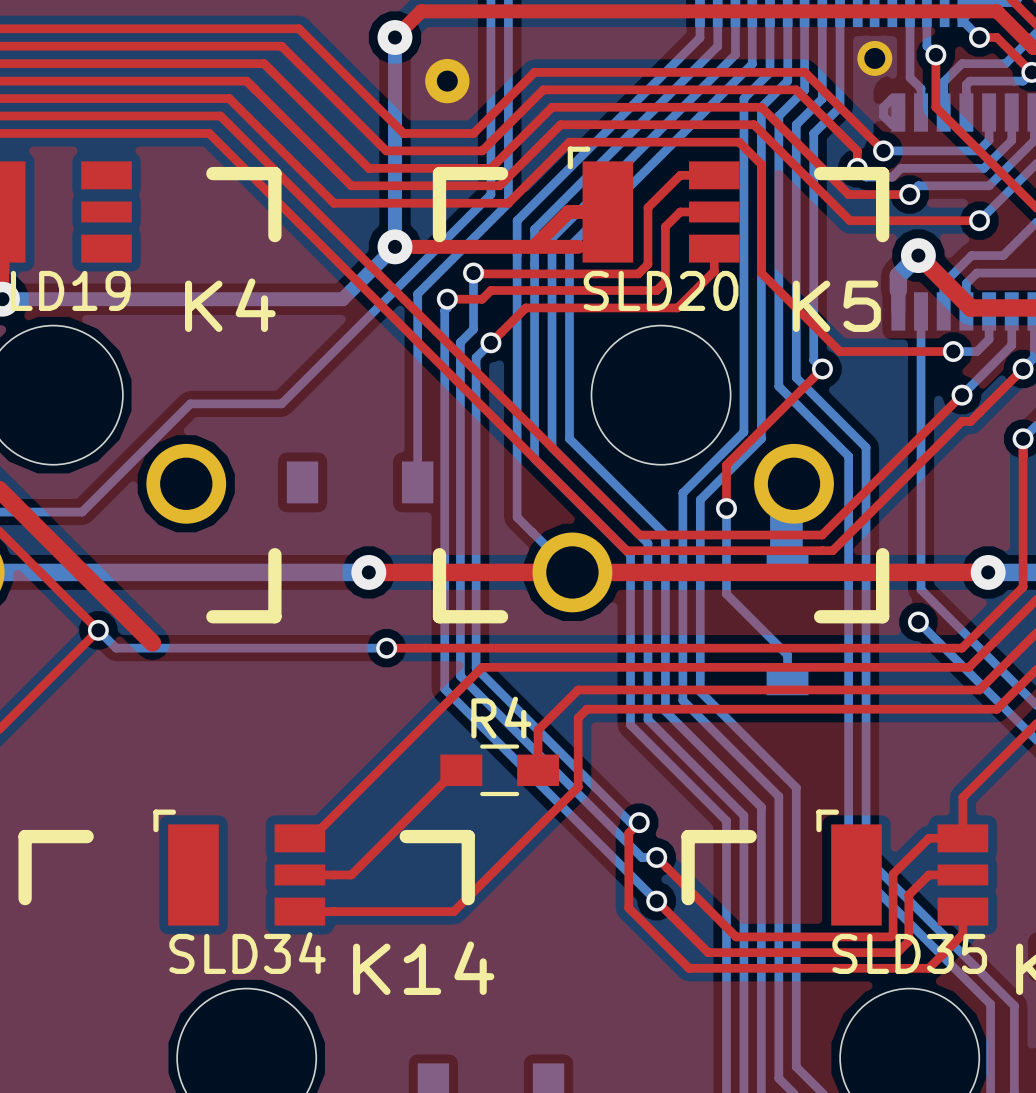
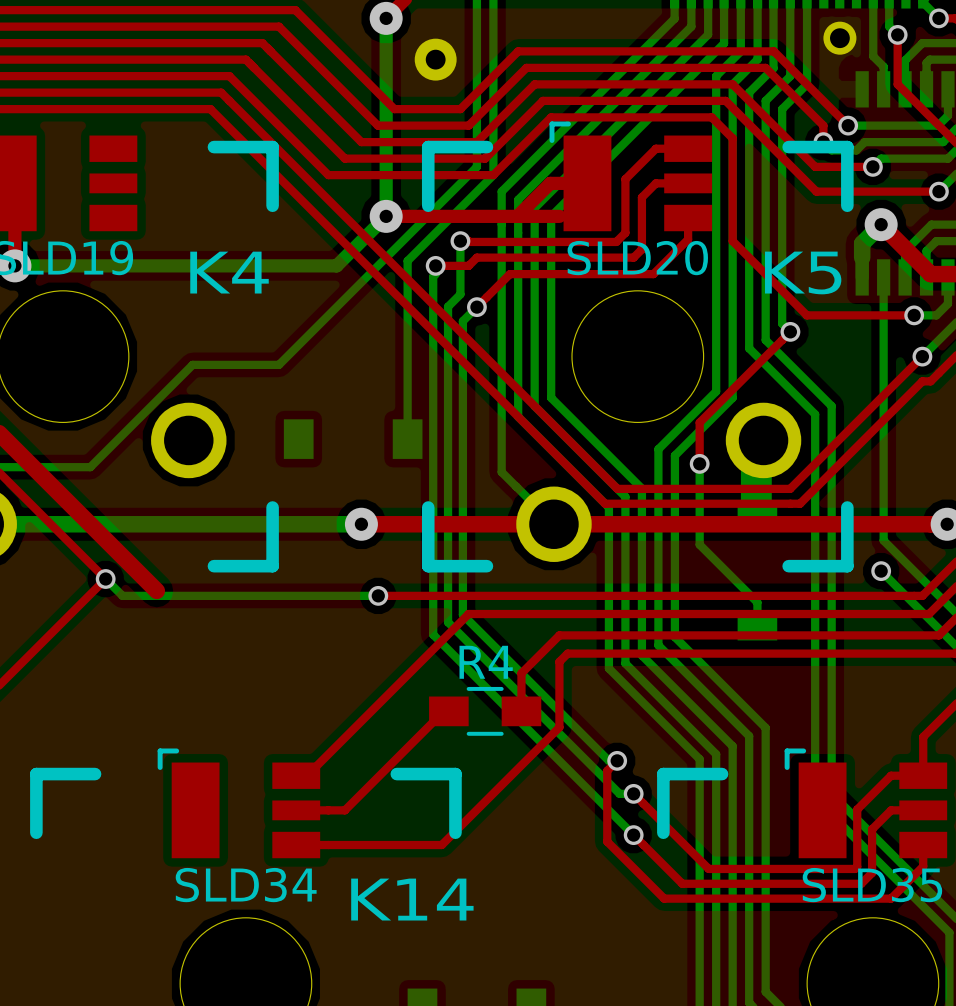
bottom track: (892, 98) (898, 101) (898, 112) (892, 124) (883, 116) (883, 107) (892, 98) -> none

